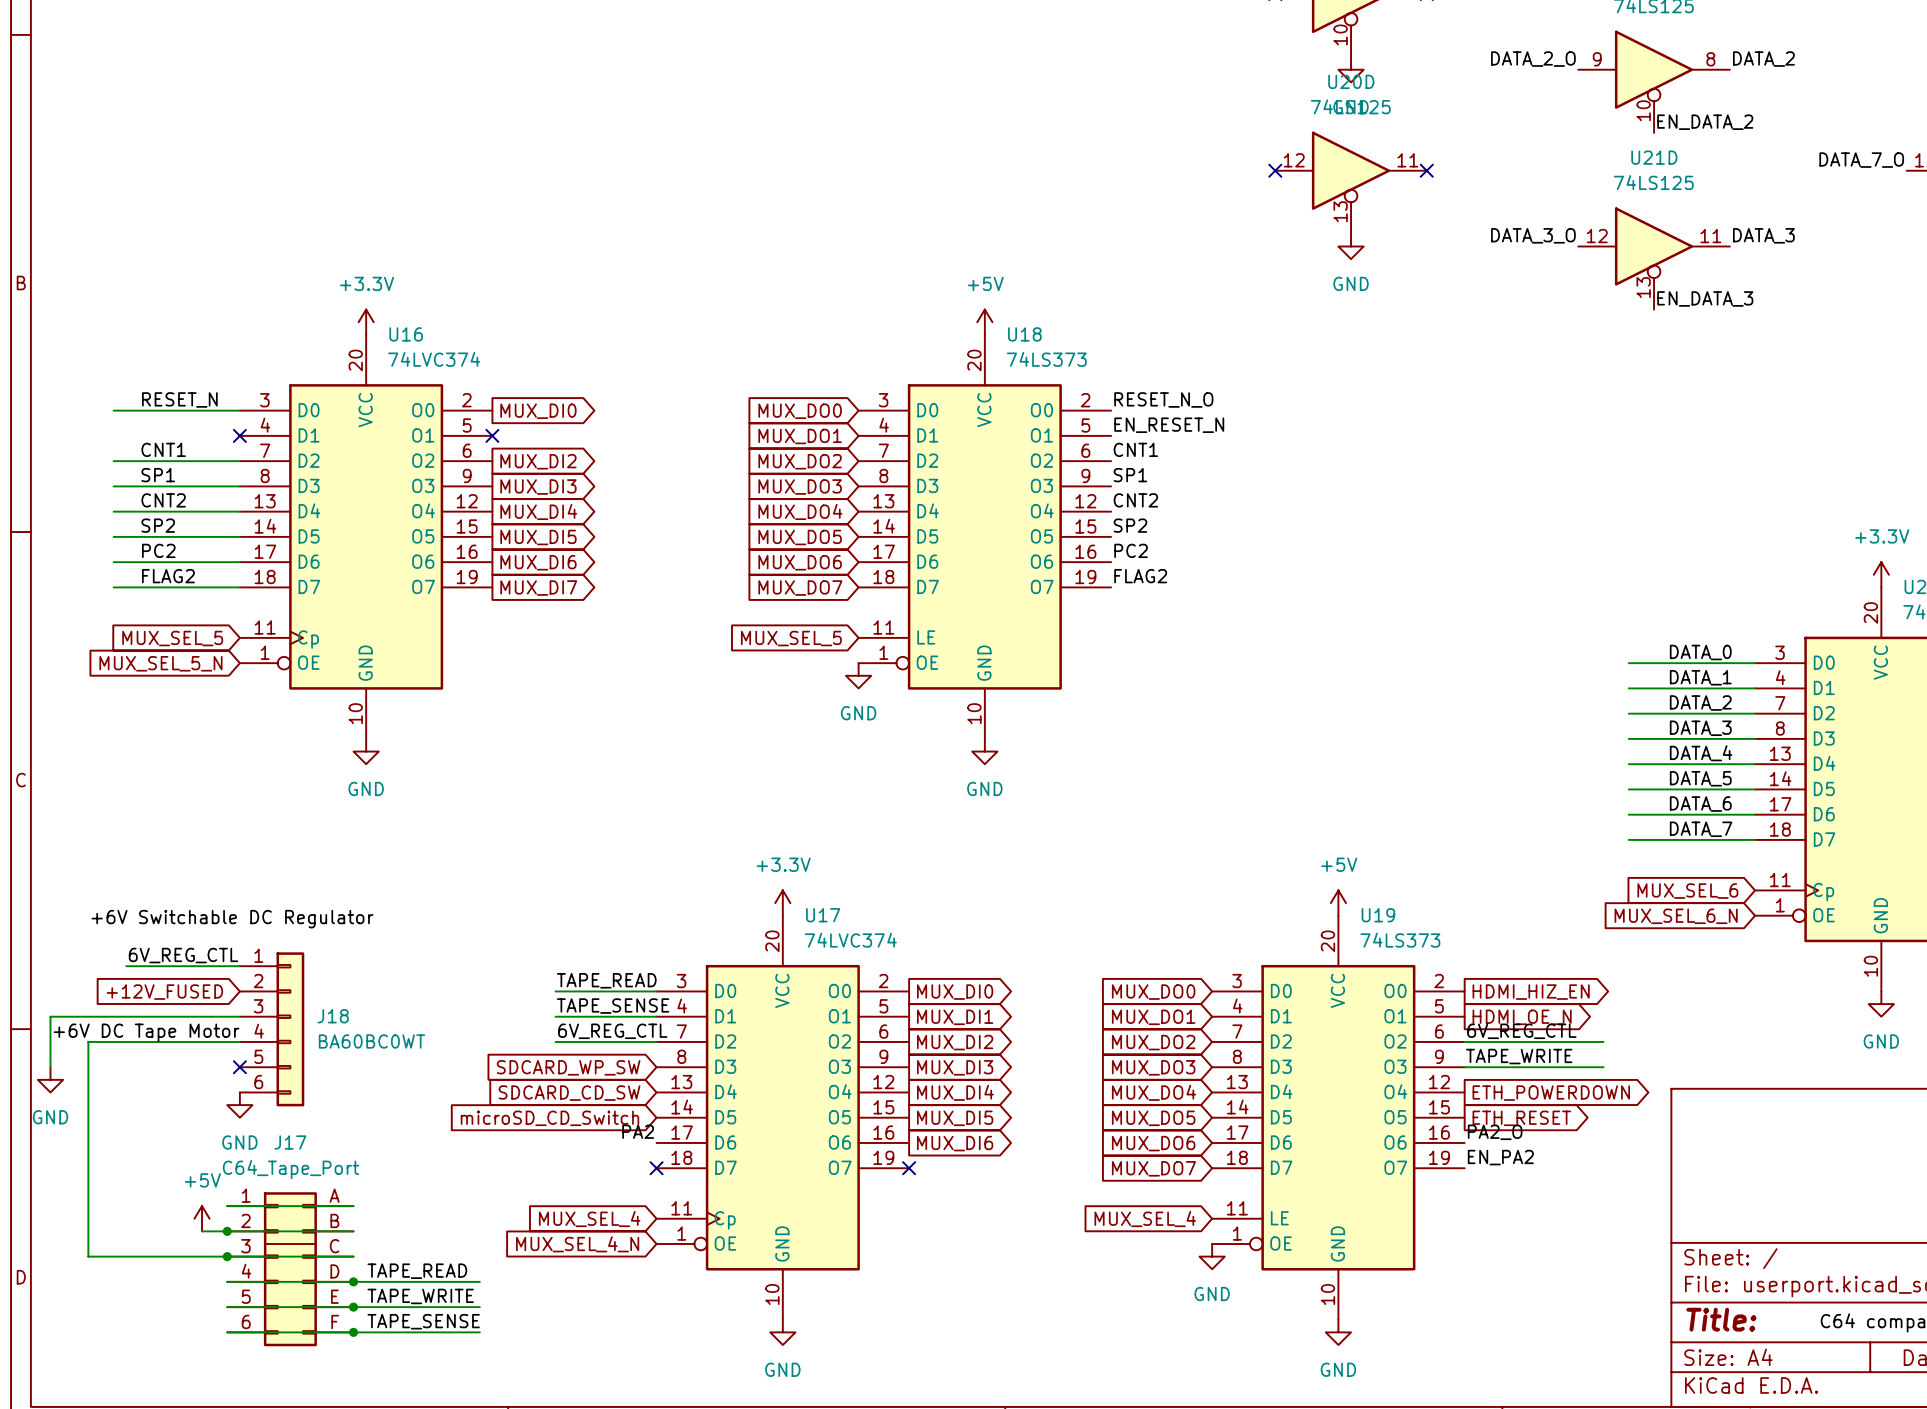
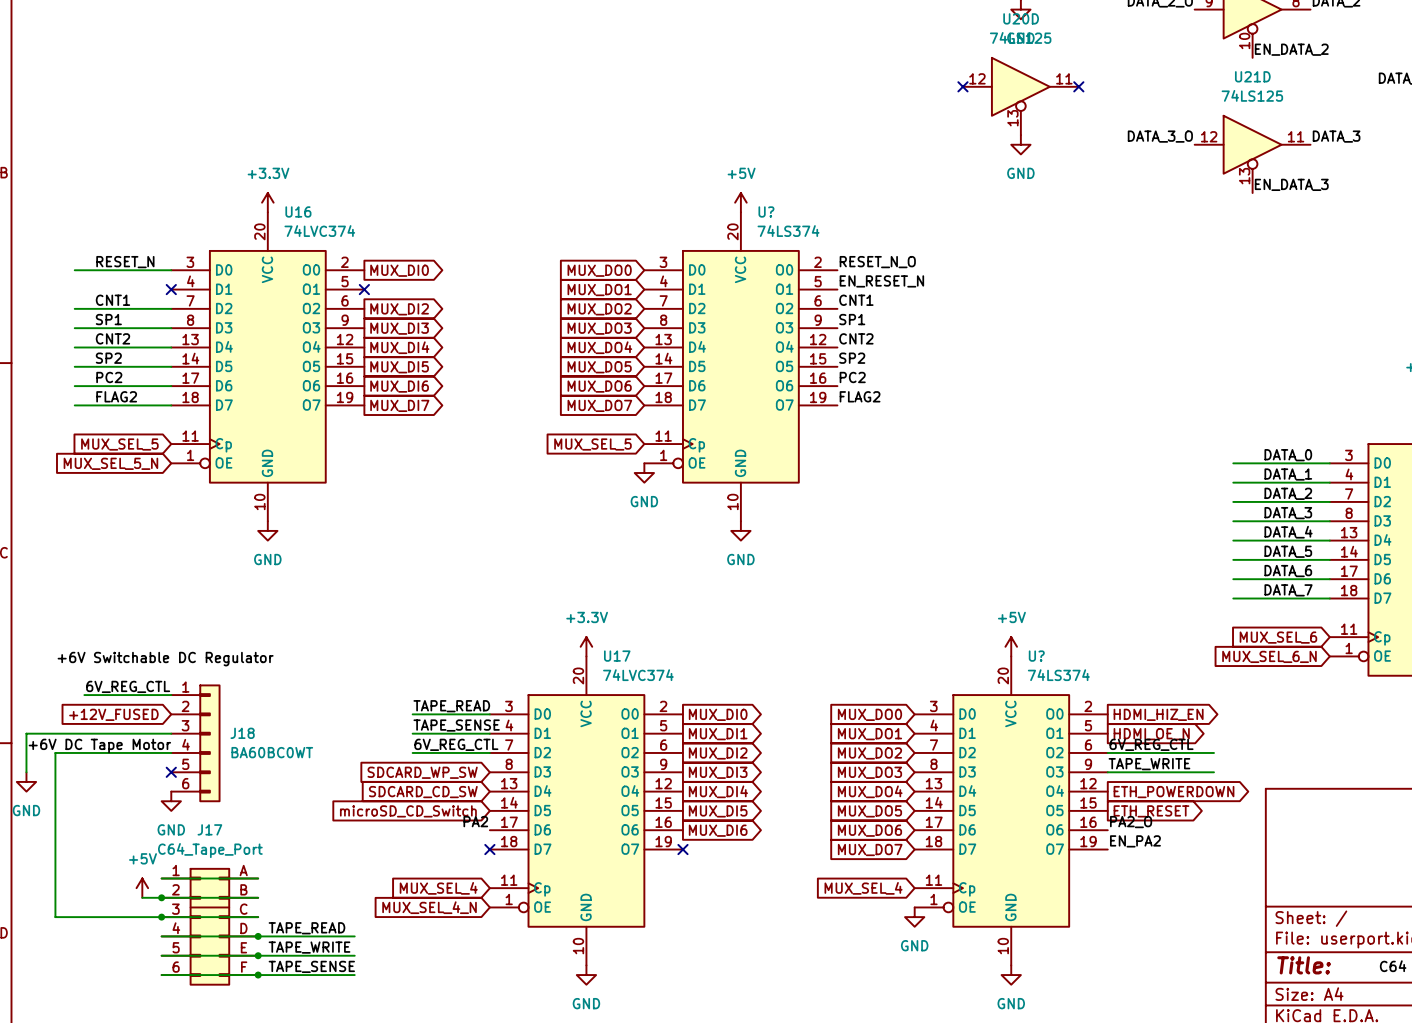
U18: 74LS373 (984, 536) -> none
U?: none -> 74LS374 (740, 366)
U19: 74LS373 (1338, 1117) -> none
U?: none -> 74LS374 (1011, 810)

